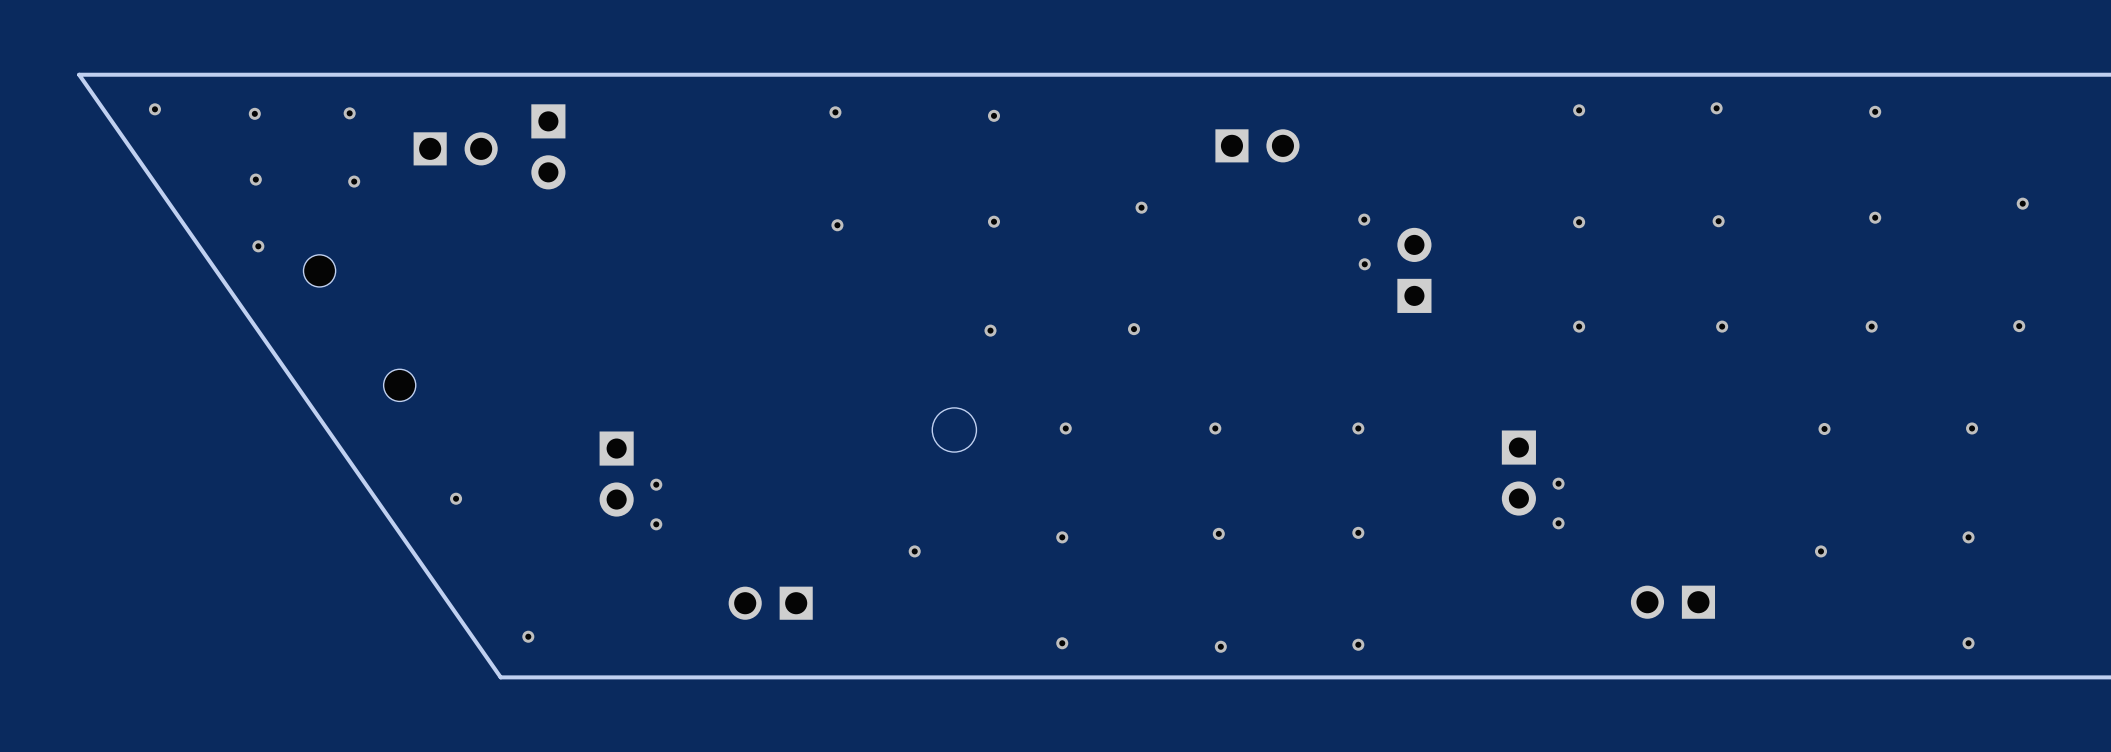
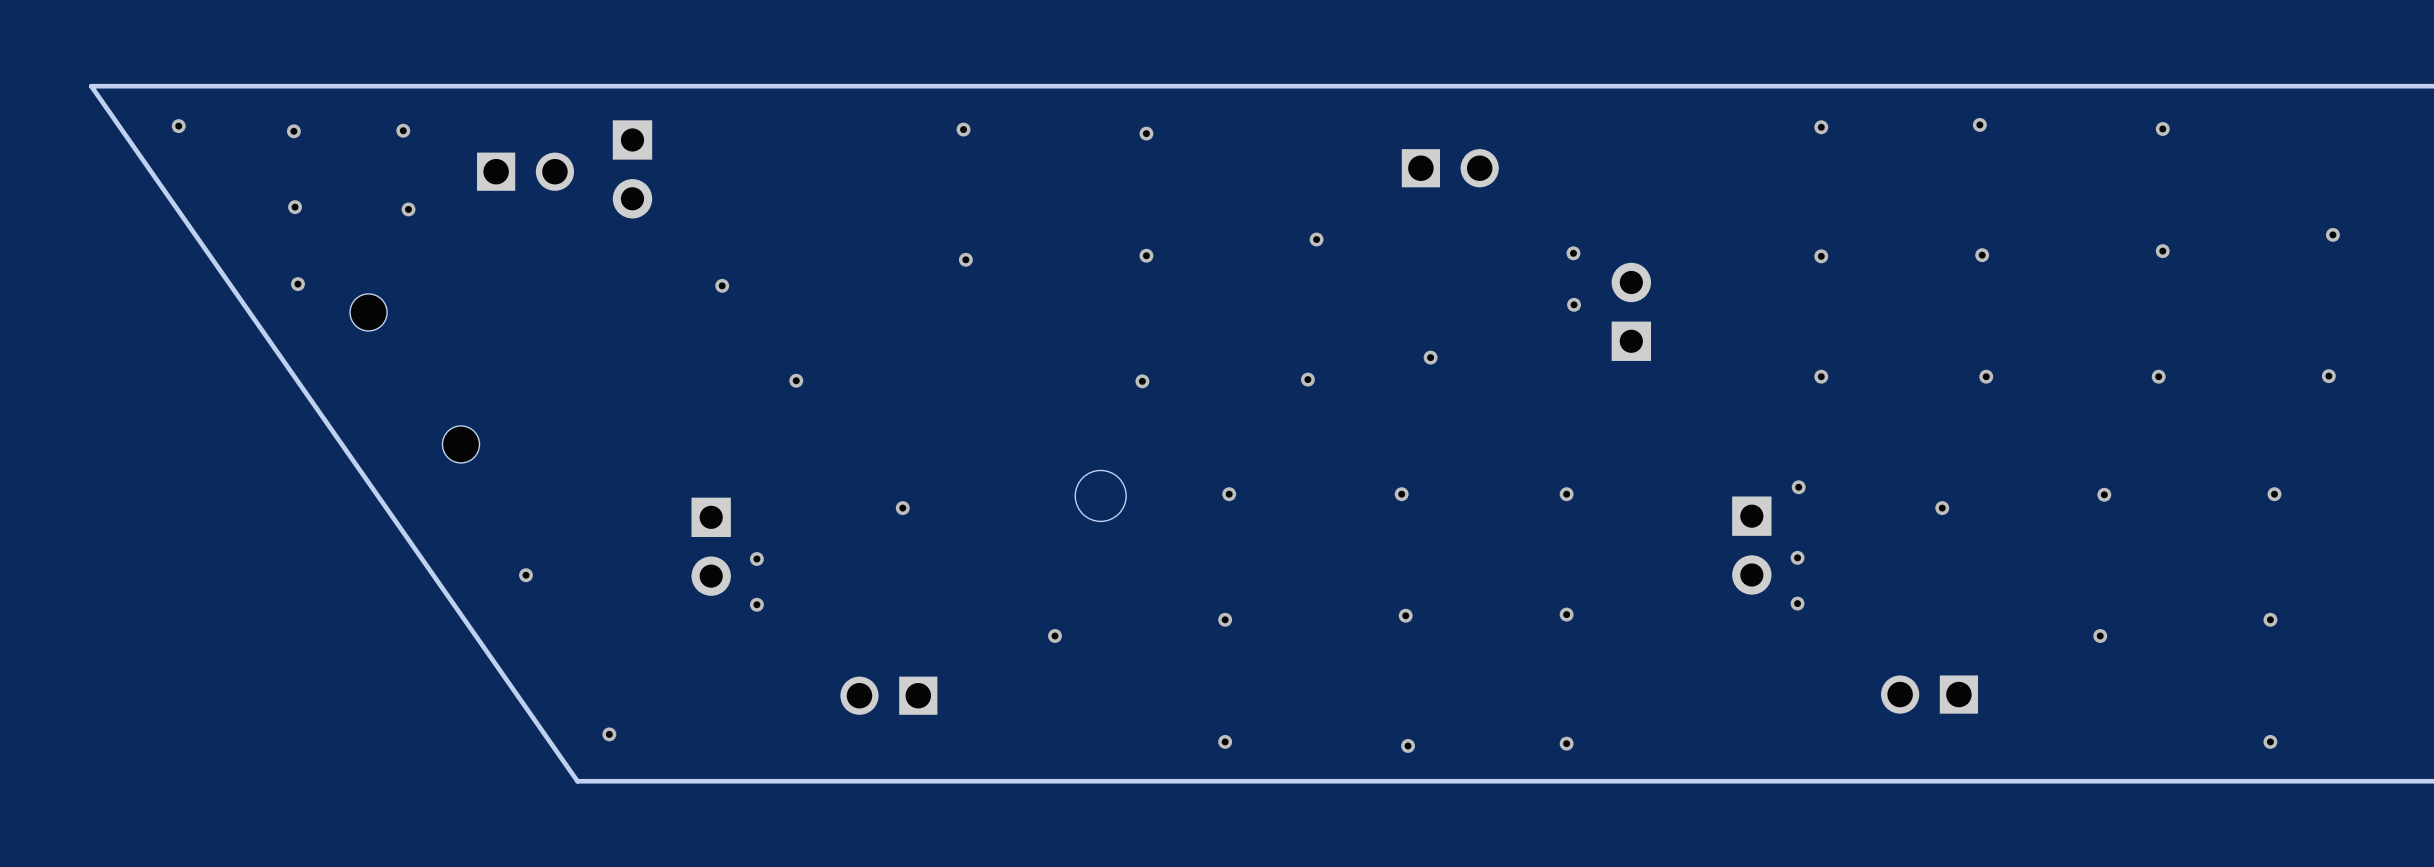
via: none -> (722, 285)
via: none -> (1430, 357)
via: none -> (796, 380)
via: none -> (1798, 487)
via: none -> (902, 508)
via: none -> (1942, 508)

